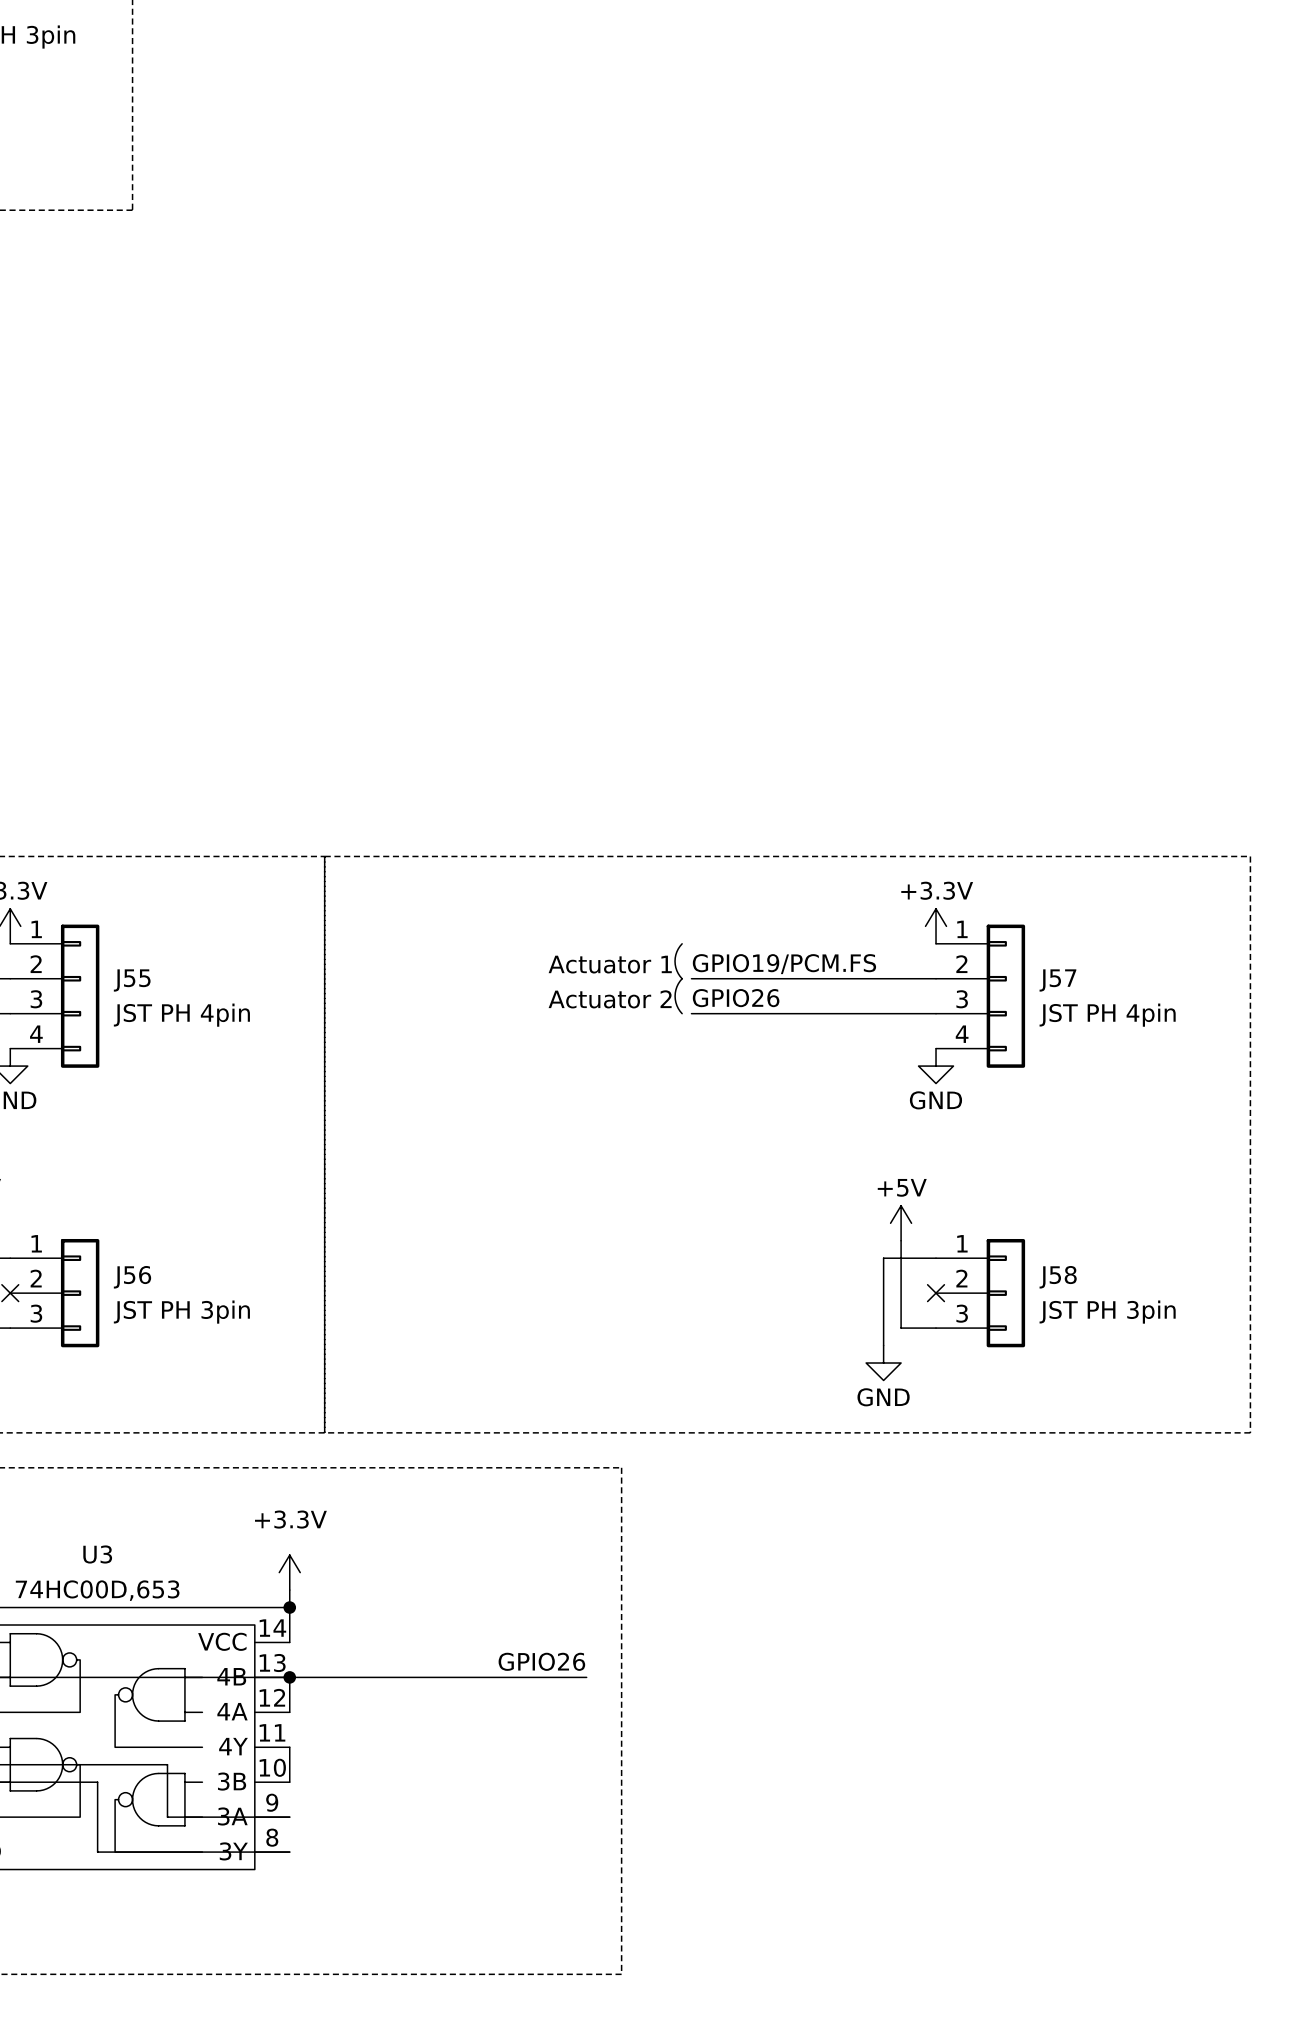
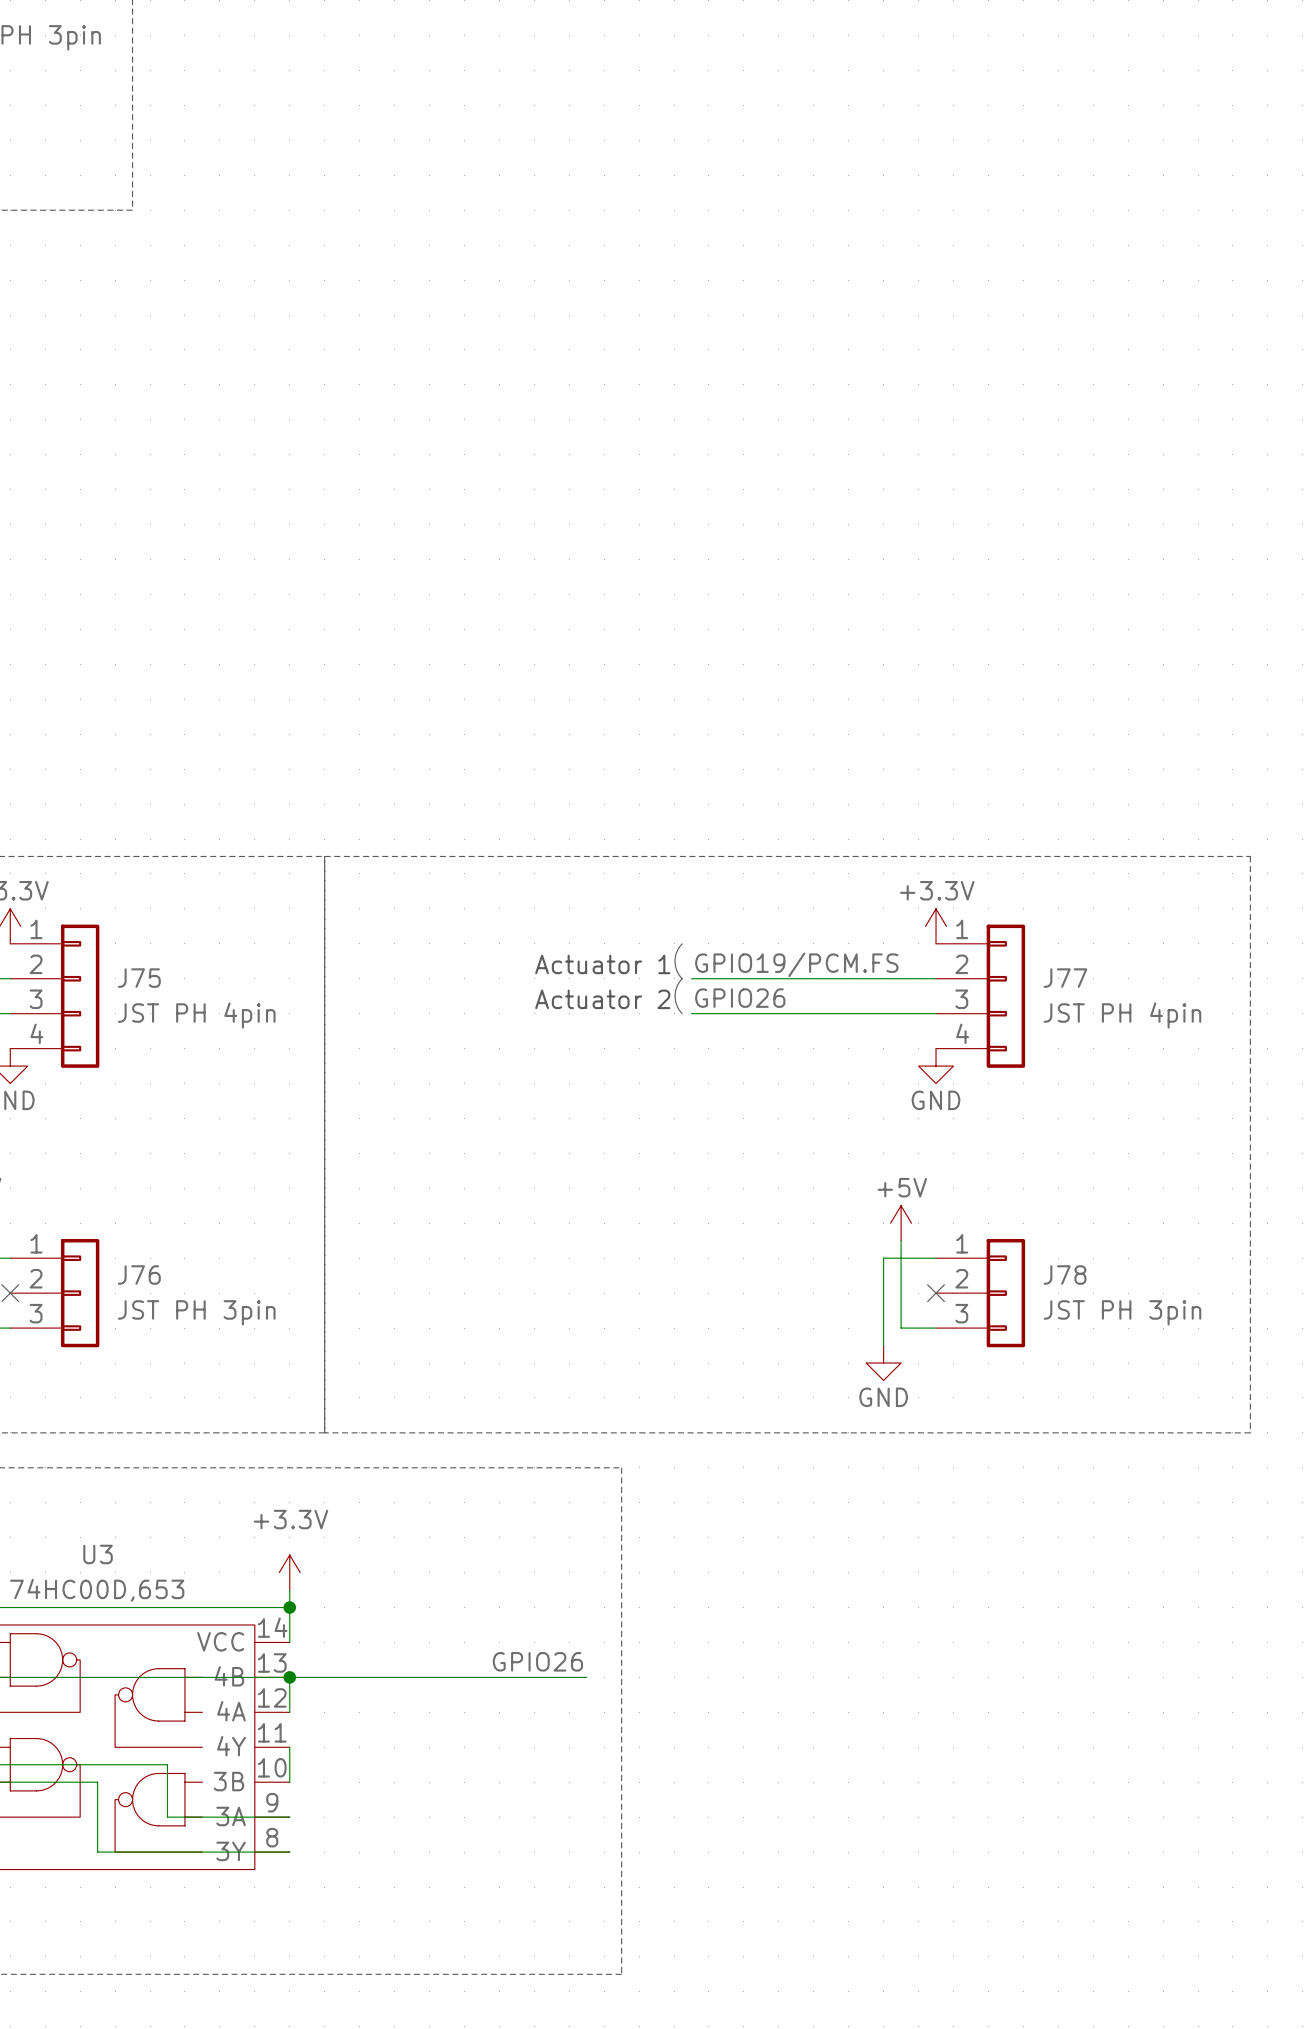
J55 name: J55 (132, 980) -> J75 (139, 978)
J57 name: J57 (1057, 980) -> J77 (1065, 978)
J56 name: J56 (132, 1277) -> J76 (139, 1275)
J58 name: J58 (1058, 1277) -> J78 (1065, 1275)

